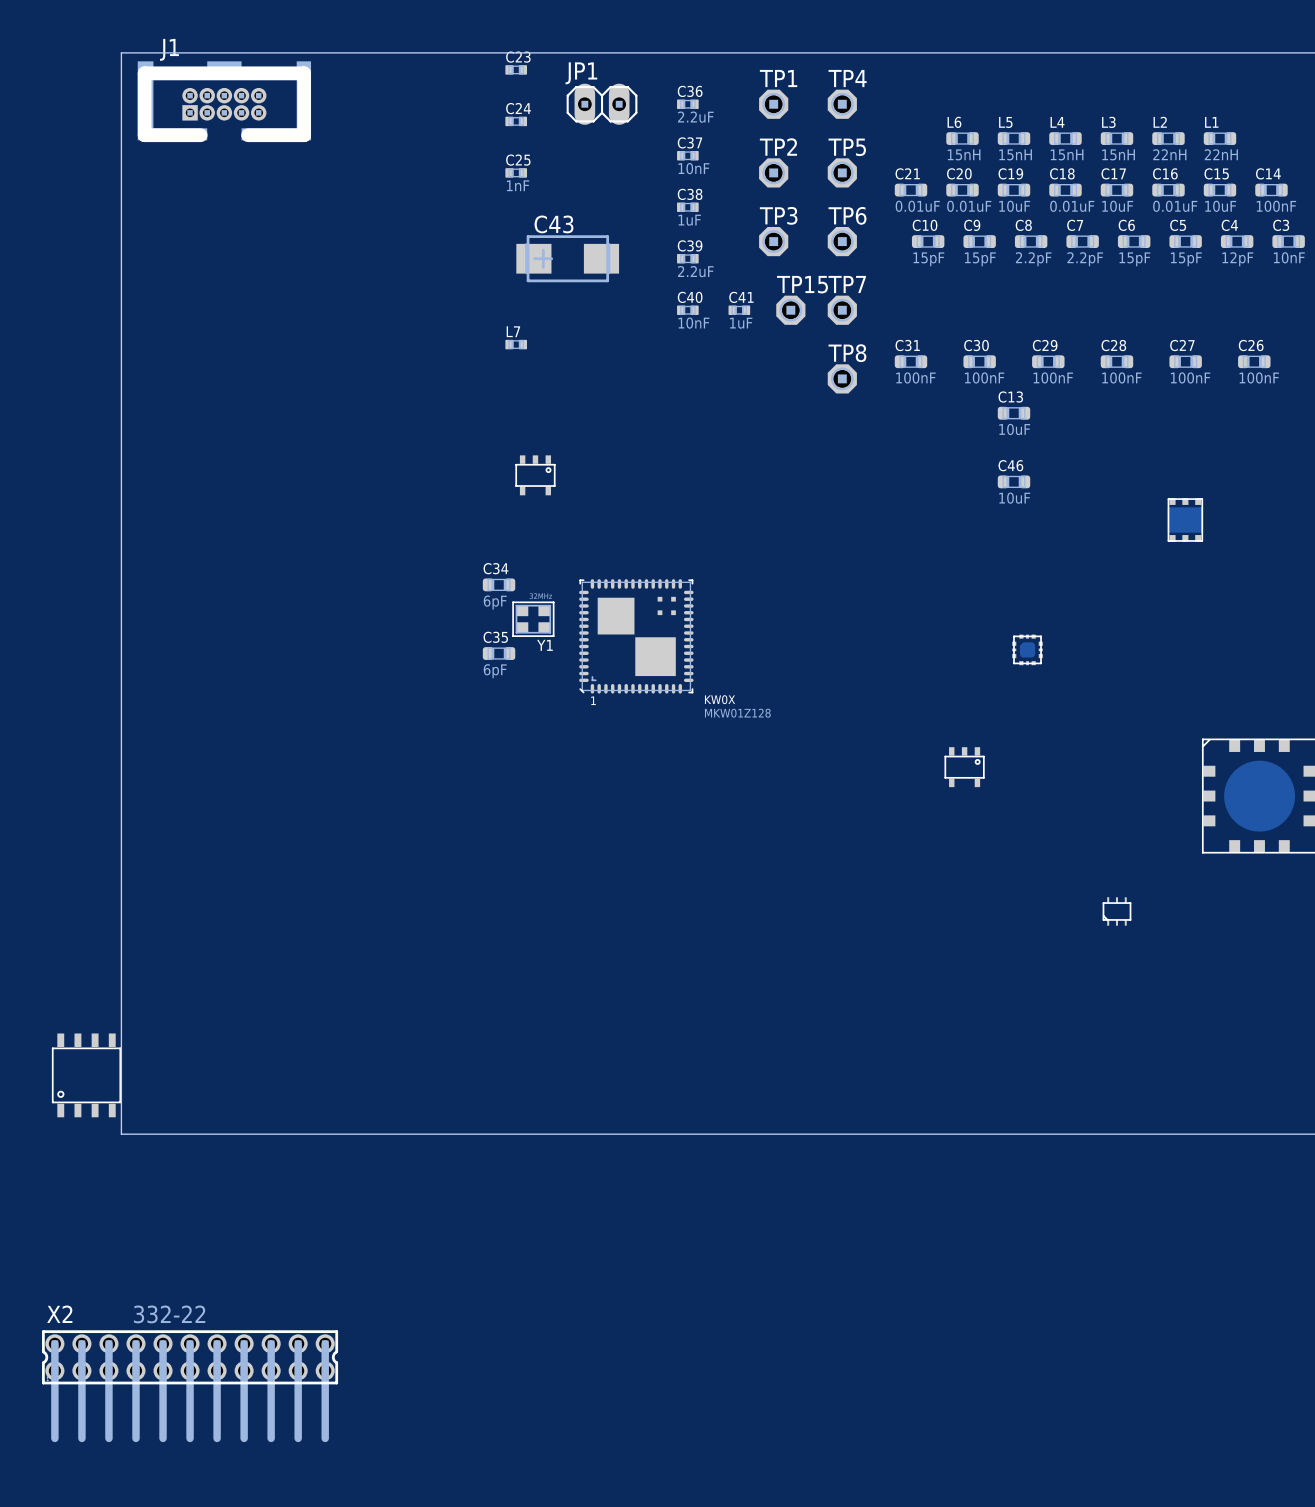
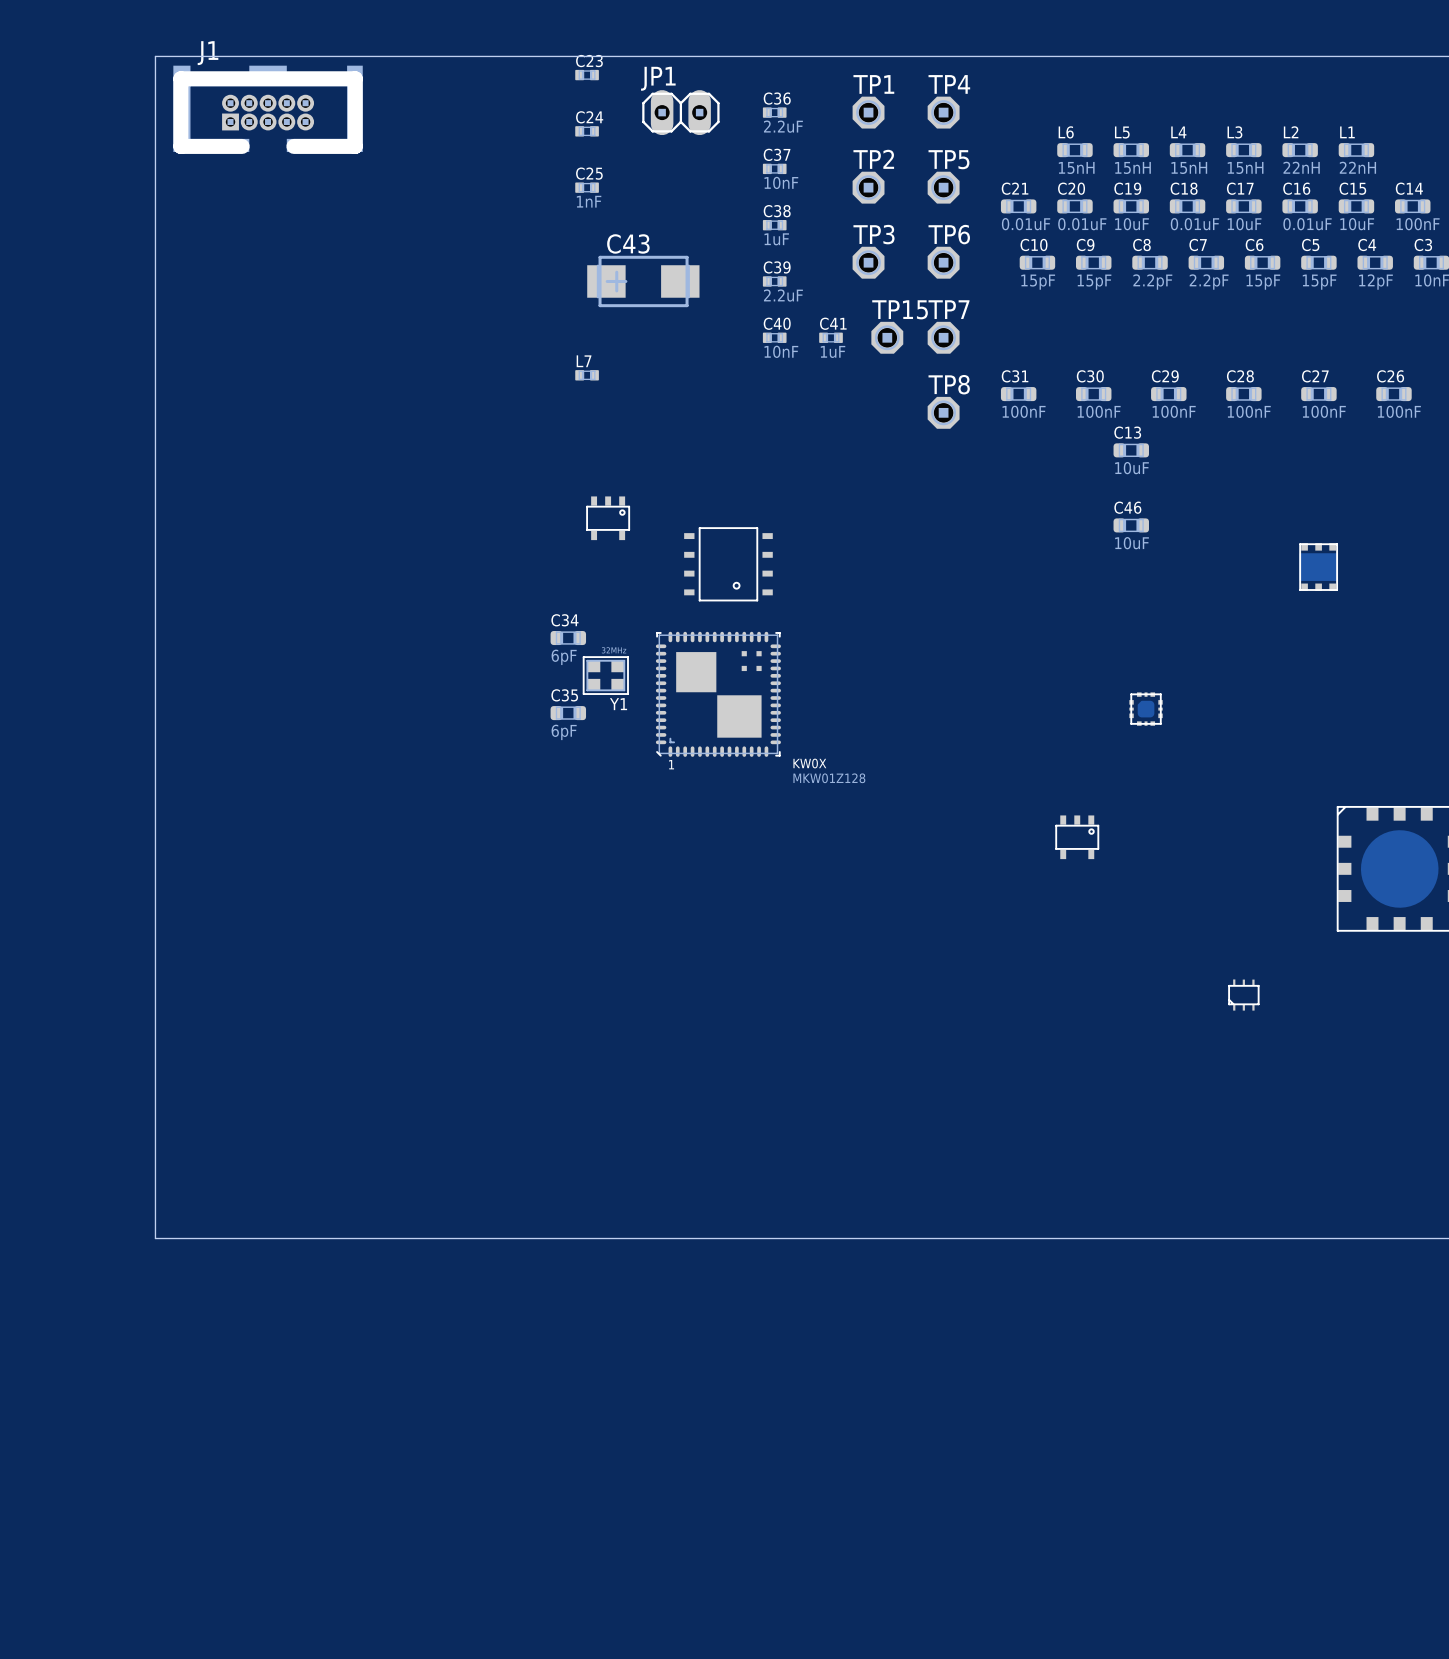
part: none -> (728, 564)
part: (86, 1075) -> none
X2: 332-22 (190, 1386) -> none

